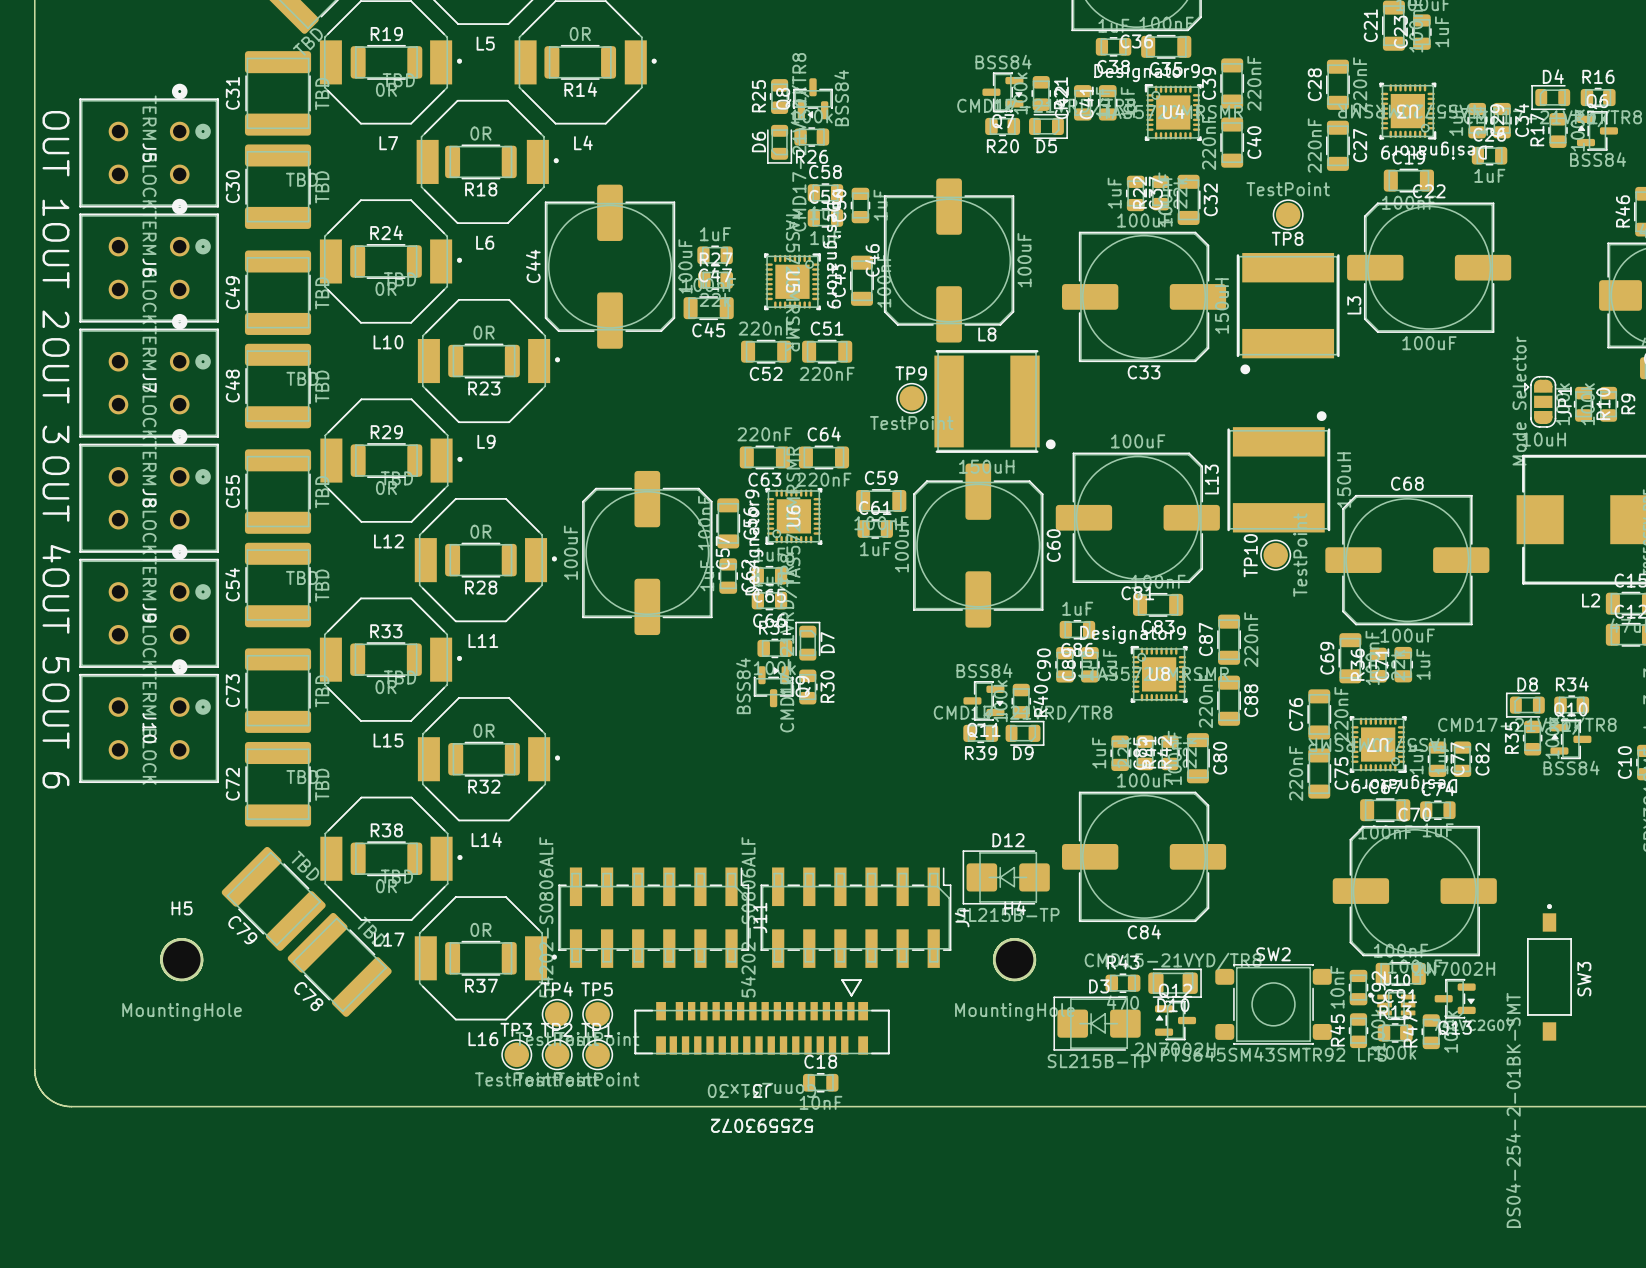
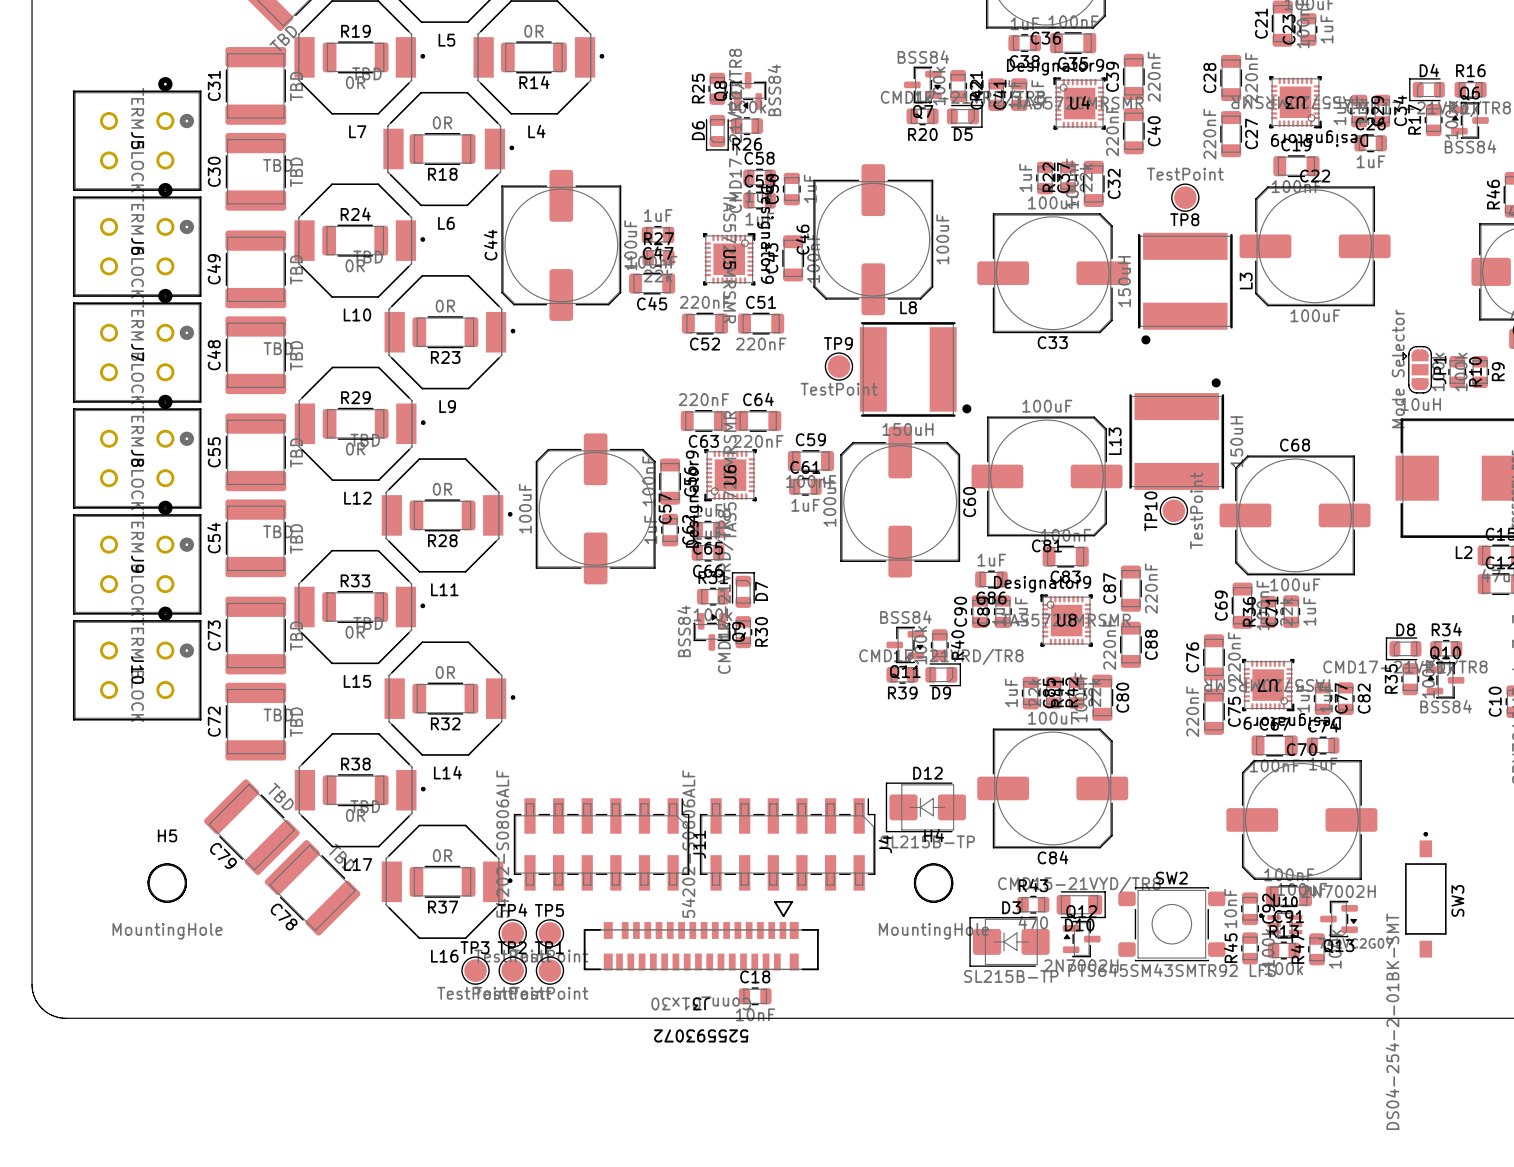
text: OUT 1 (55, 163) -> none
text: OUT 2 (55, 275) -> none
text: OUT 3 (55, 390) -> none
text: OUT 4 (56, 509) -> none
text: OUT 5 (55, 620) -> none
text: OUT 6 (55, 735) -> none

